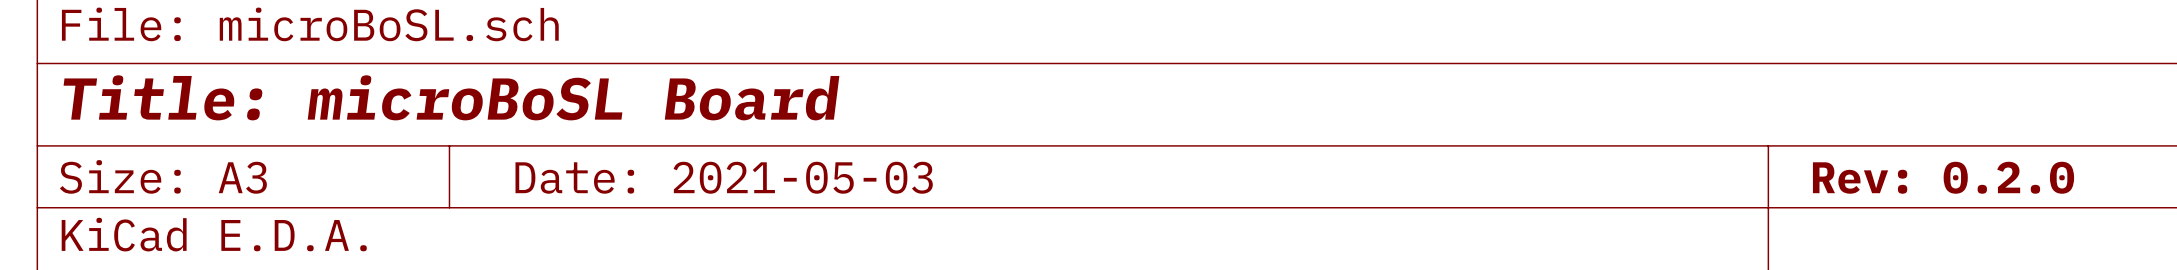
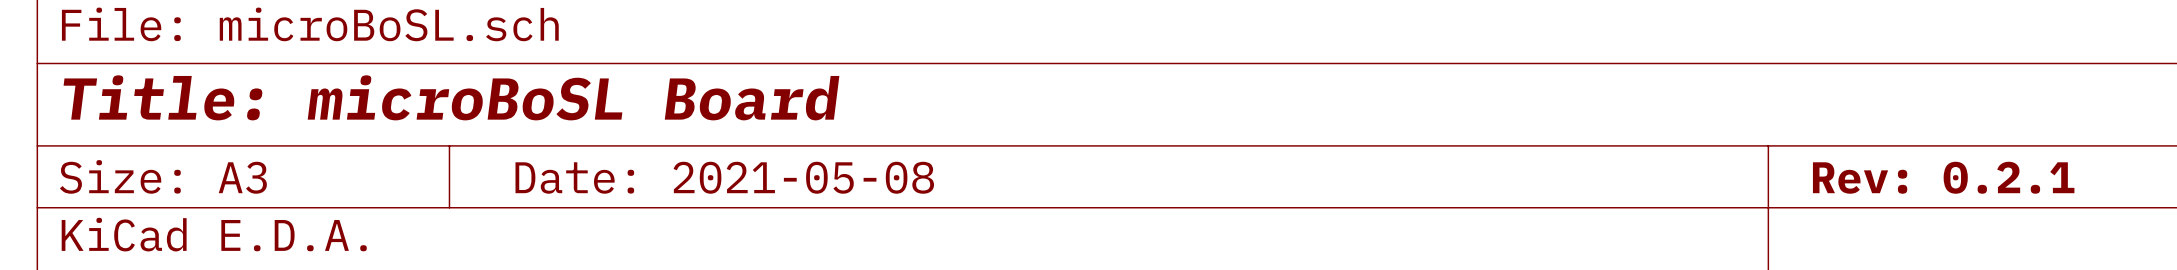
title block: Date: 2021-05-03 (724, 177) -> Date: 2021-05-08 (724, 177)
title block: Rev: 0.2.0 (1943, 177) -> Rev: 0.2.1 (1943, 177)

